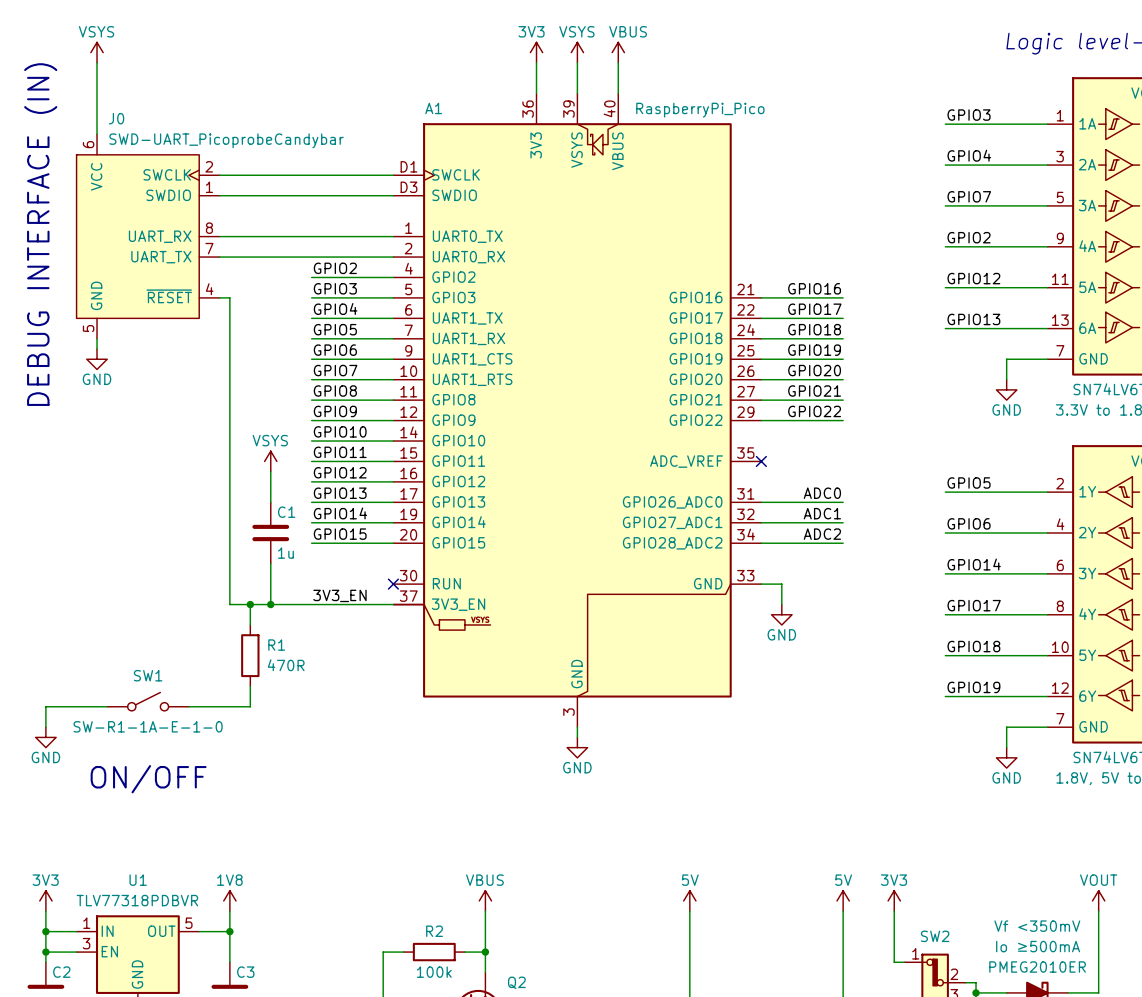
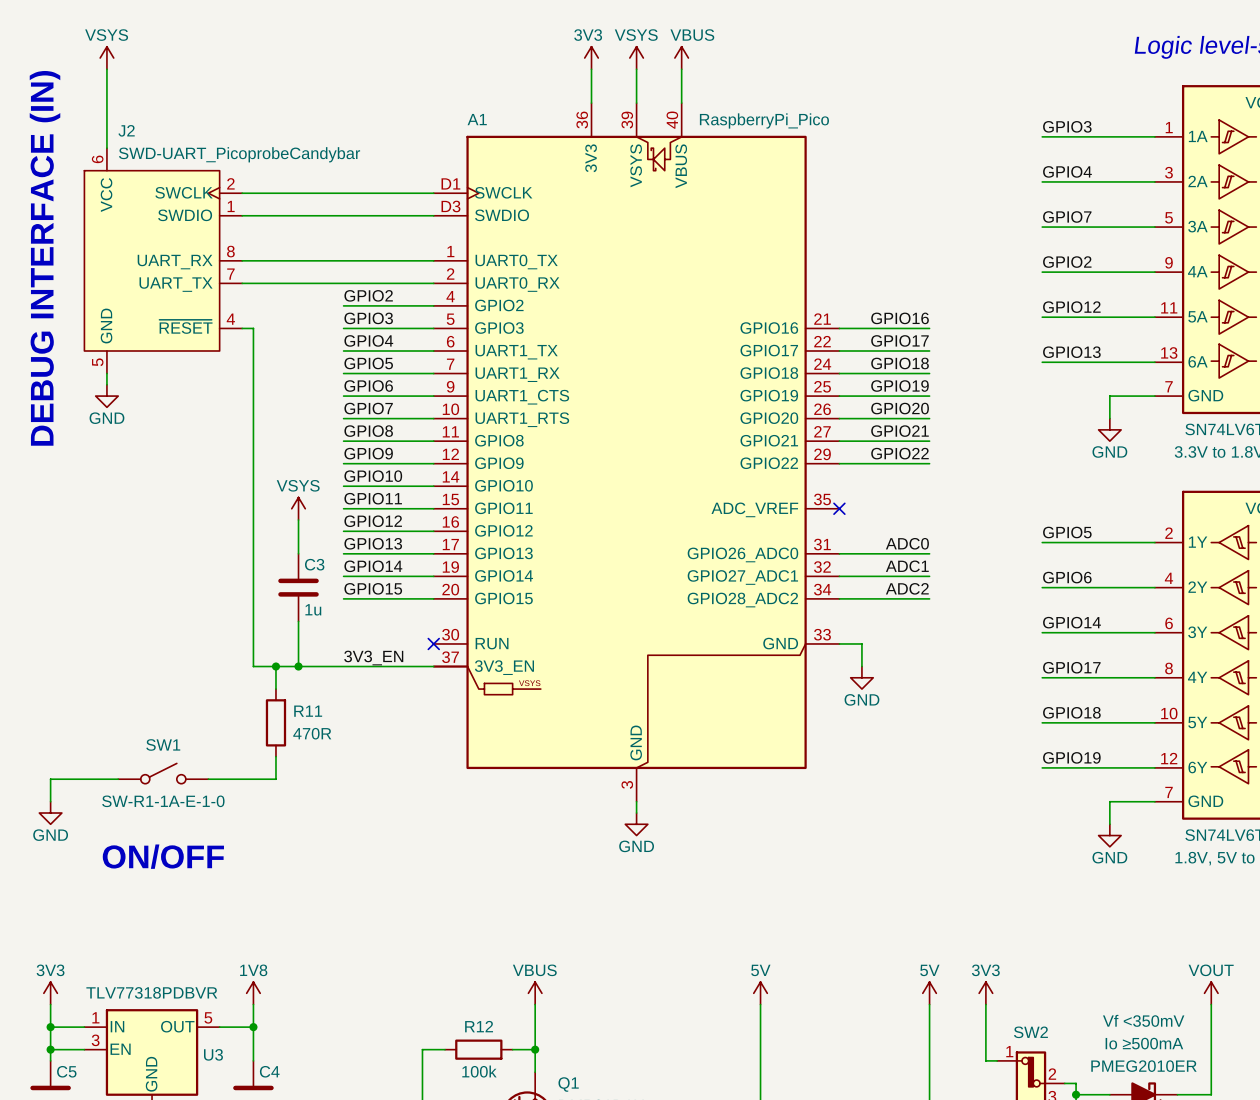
J0 name: J0 (116, 118) -> J2 (126, 130)
C1 name: C1 (286, 512) -> C3 (314, 564)
R1 name: R1 (276, 645) -> R11 (308, 711)
U1 name: U1 (138, 880) -> U3 (213, 1054)
R2 name: R2 (434, 931) -> R12 (479, 1026)
C2 name: C2 (61, 972) -> C5 (66, 1071)
C3 name: C3 (245, 972) -> C4 (269, 1071)
Q2 name: Q2 (516, 982) -> Q1 (568, 1084)

